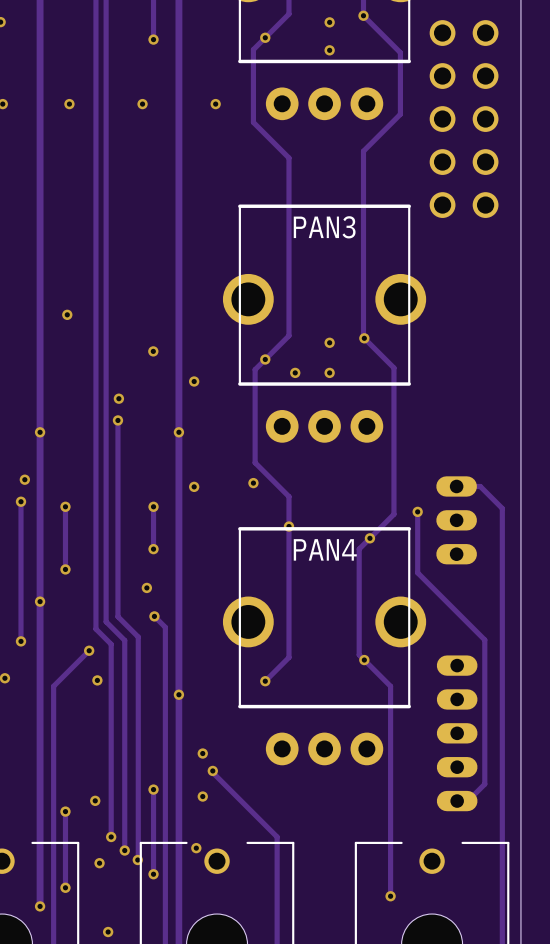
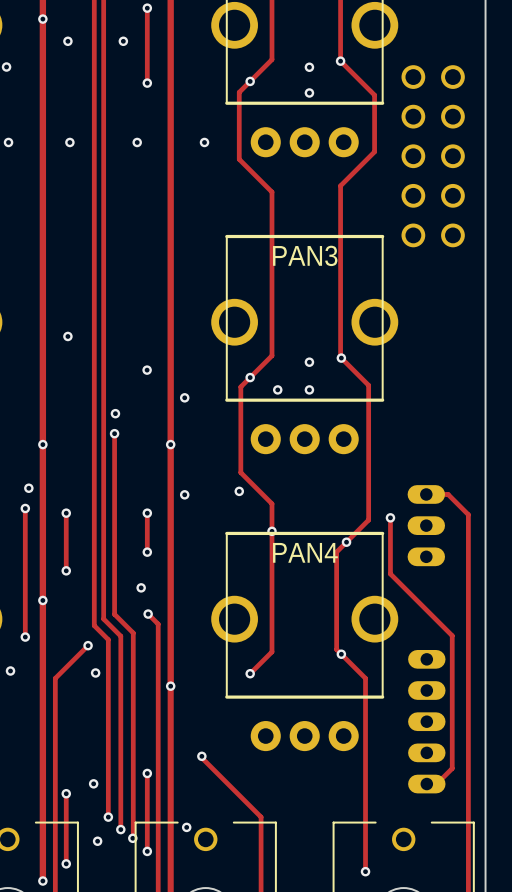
via: (202, 753) -> none
via: (202, 796) -> none

